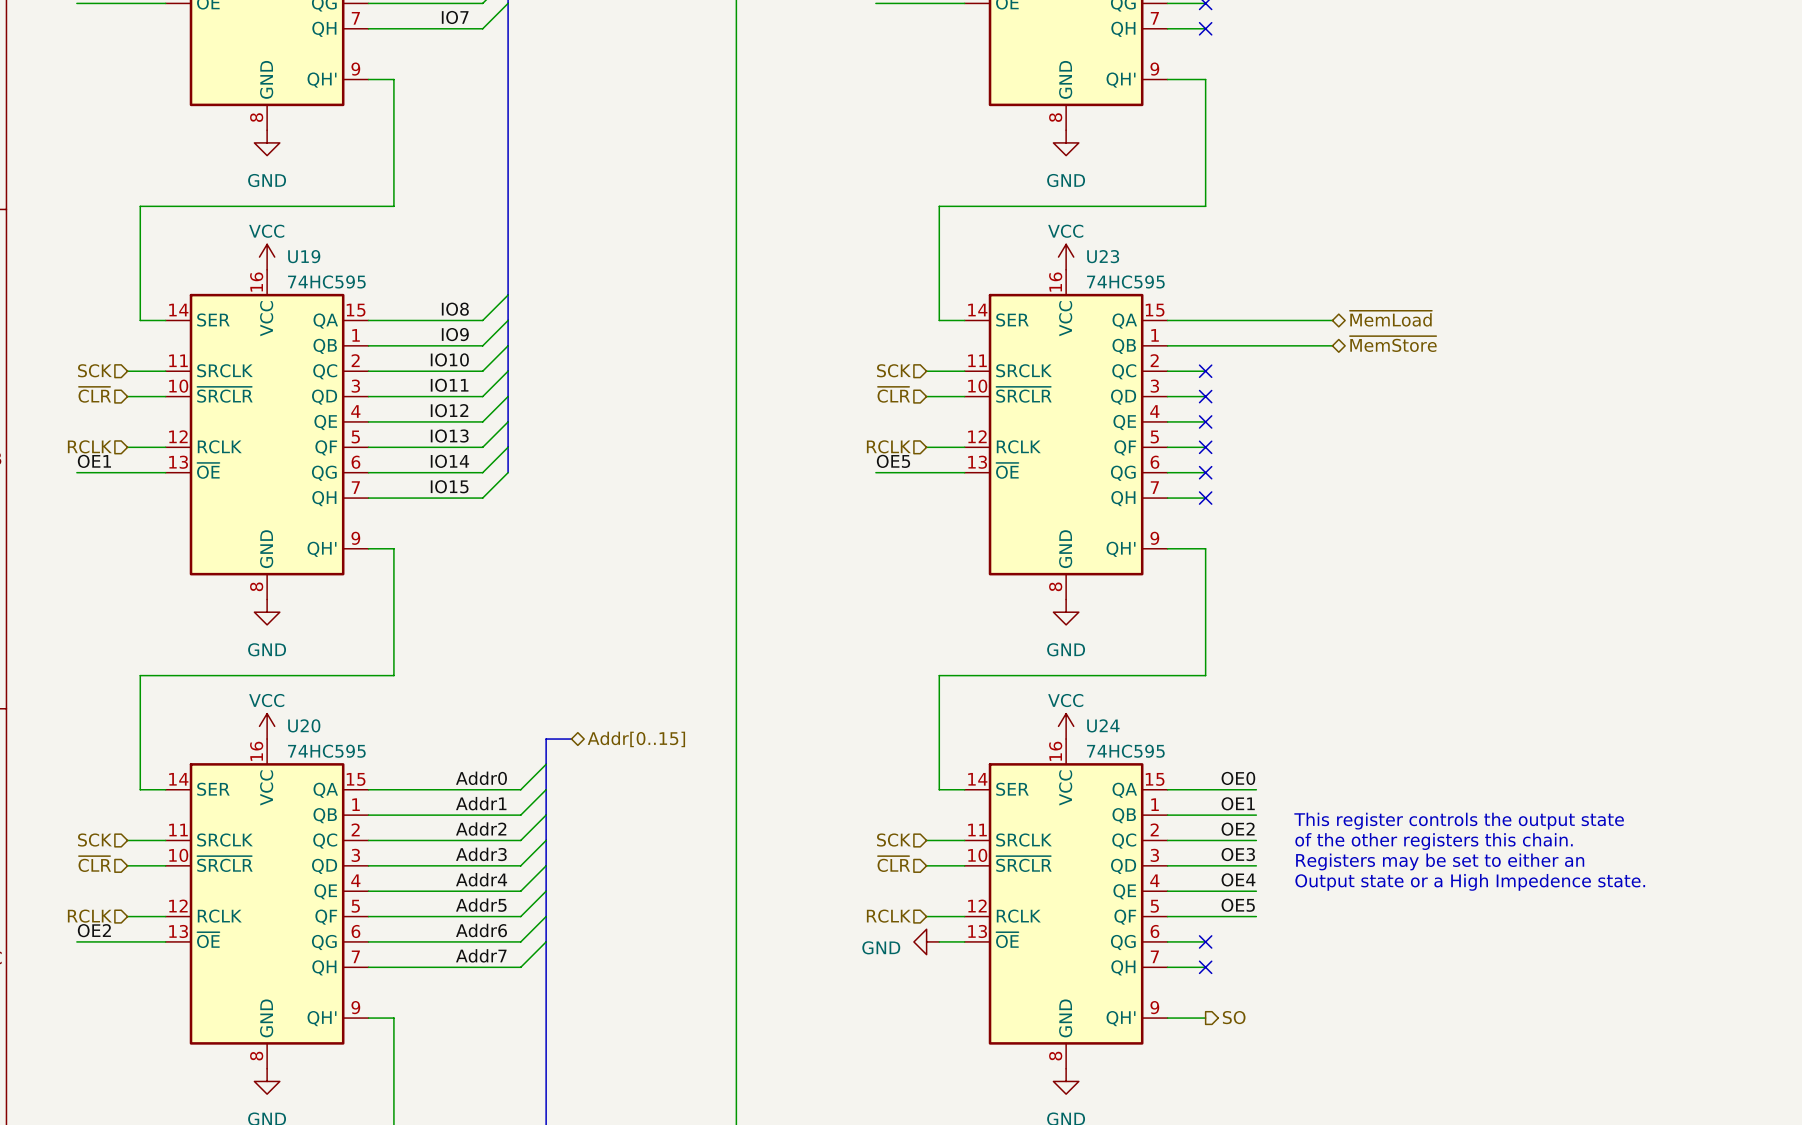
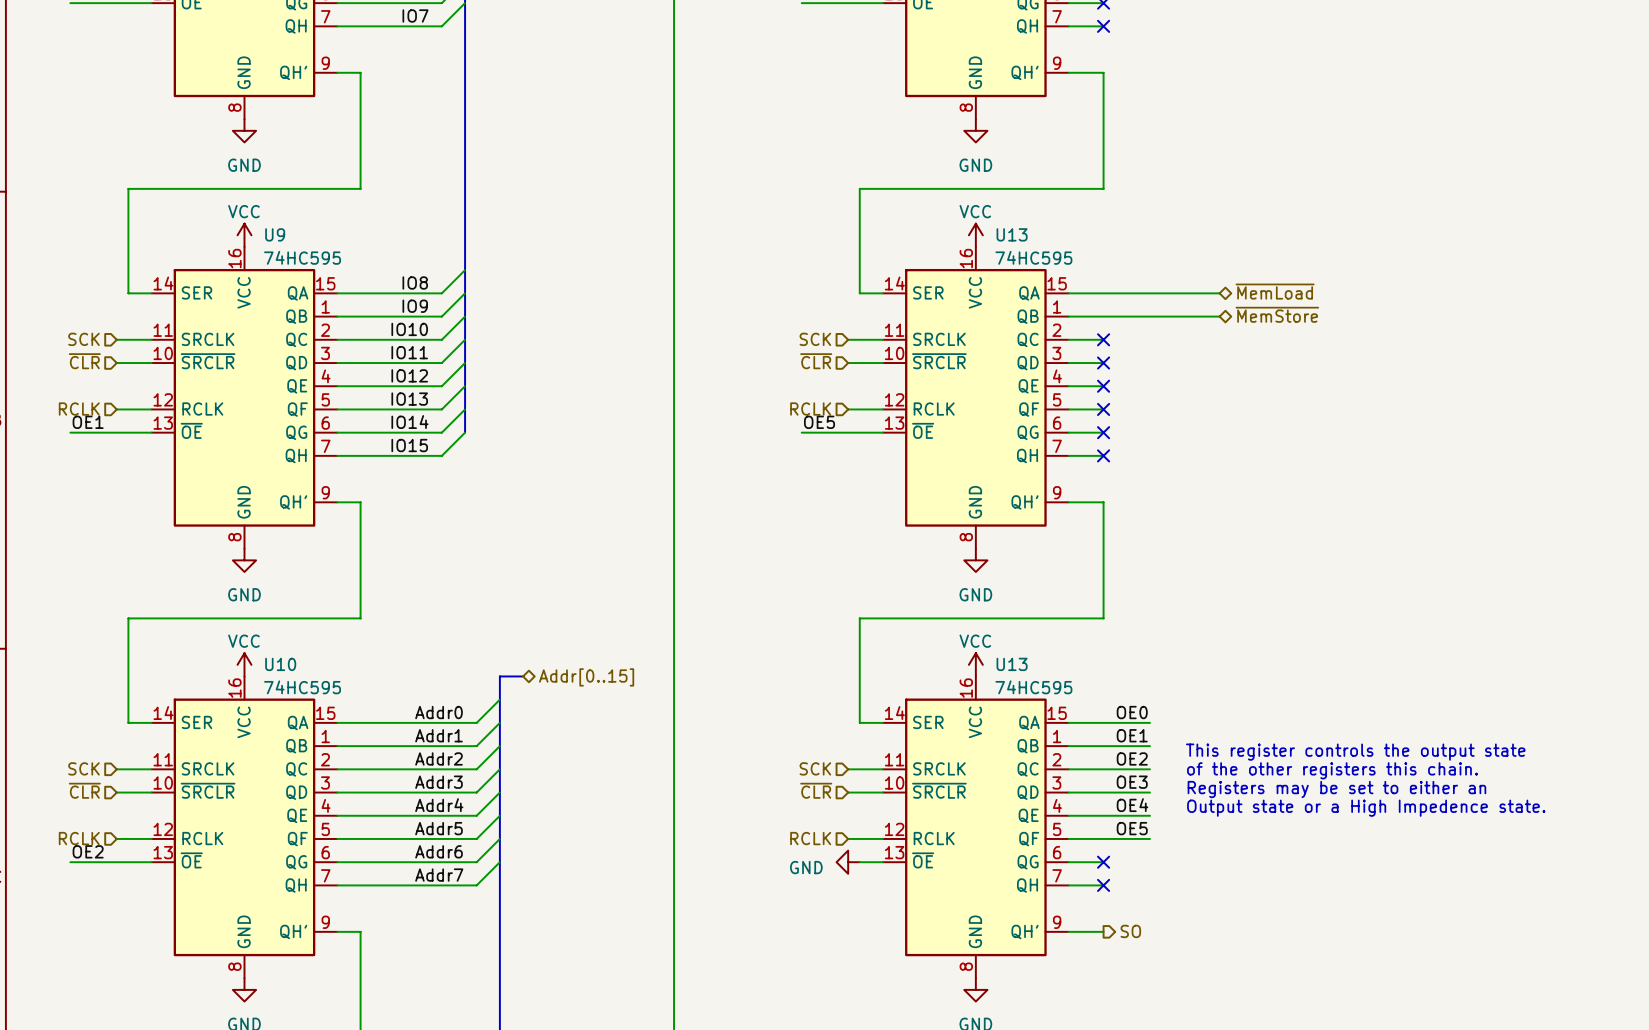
U19 name: U19 (304, 256) -> U9 (275, 234)
U23 name: U23 (1103, 256) -> U13 (1012, 234)
U20 name: U20 (304, 725) -> U10 (280, 664)
U24 name: U24 (1103, 725) -> U13 (1012, 664)

